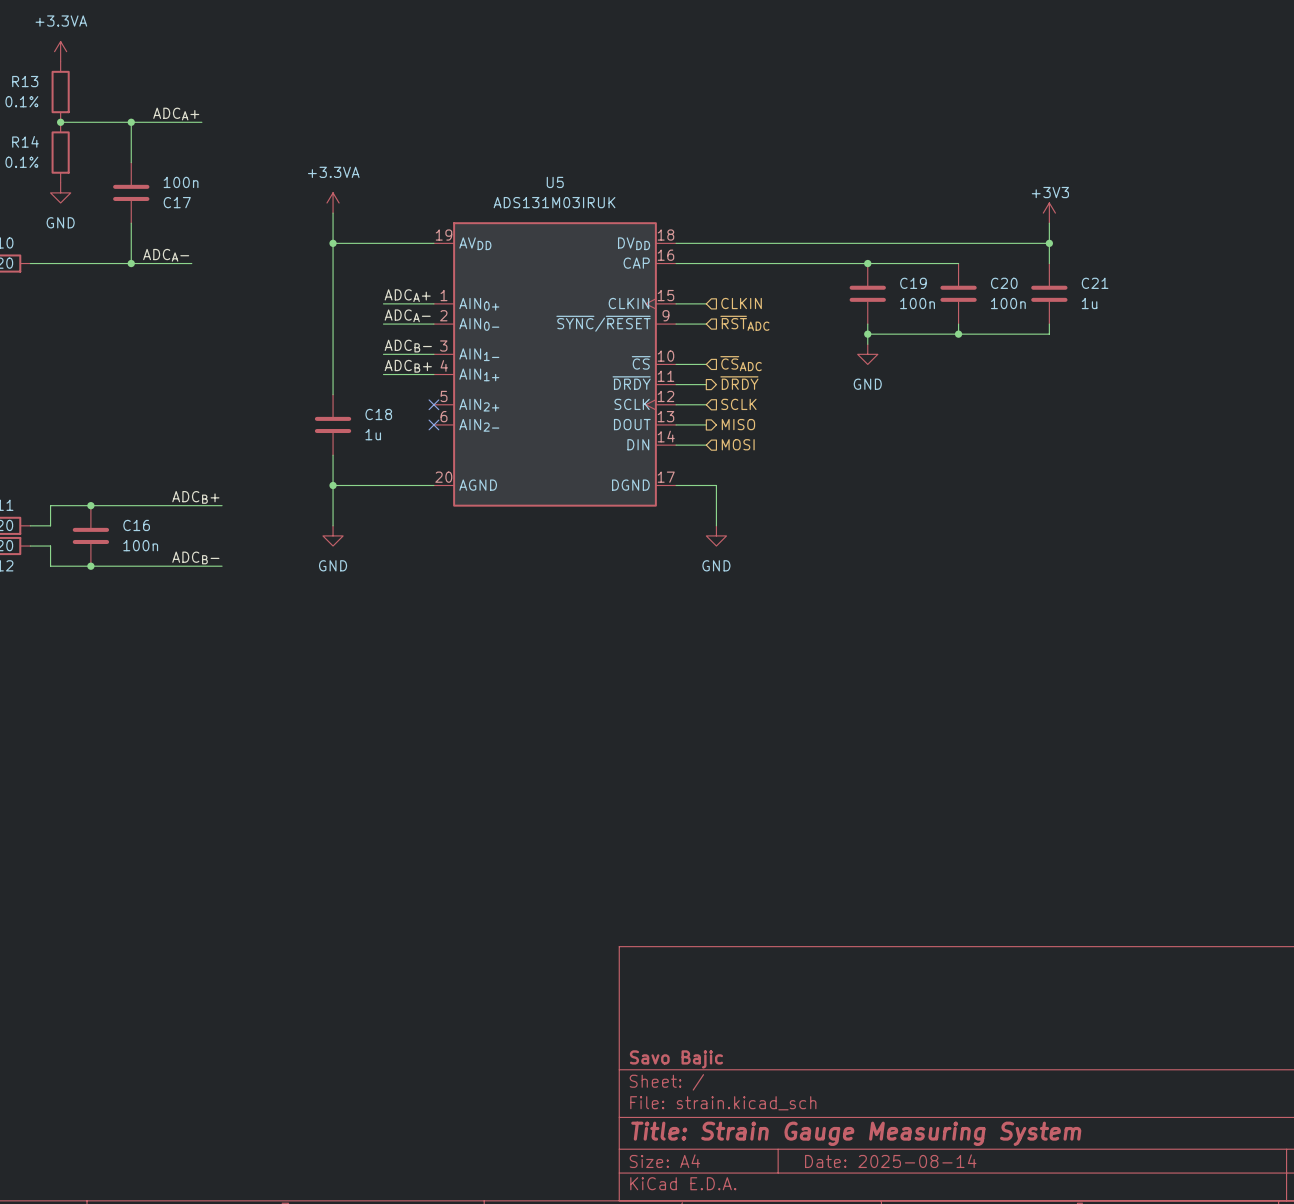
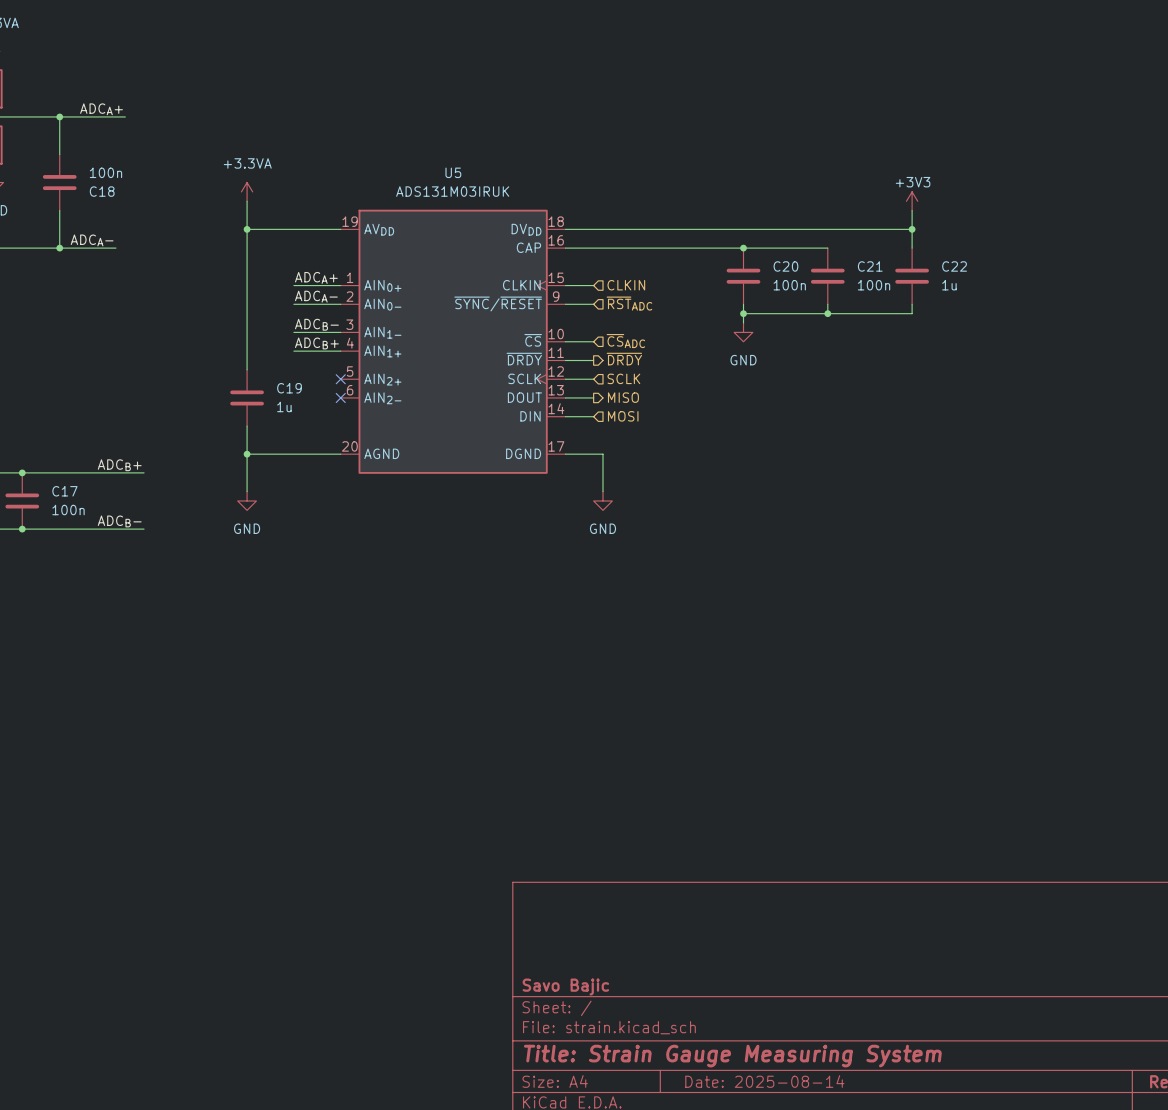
C17 name: C17 (177, 202) -> C18 (102, 191)
C19 name: C19 (913, 283) -> C20 (785, 266)
C20 name: C20 (1004, 283) -> C21 (870, 266)
C21 name: C21 (1095, 283) -> C22 (954, 266)
C18 name: C18 (378, 414) -> C19 (289, 388)
C16 name: C16 (136, 525) -> C17 (64, 491)

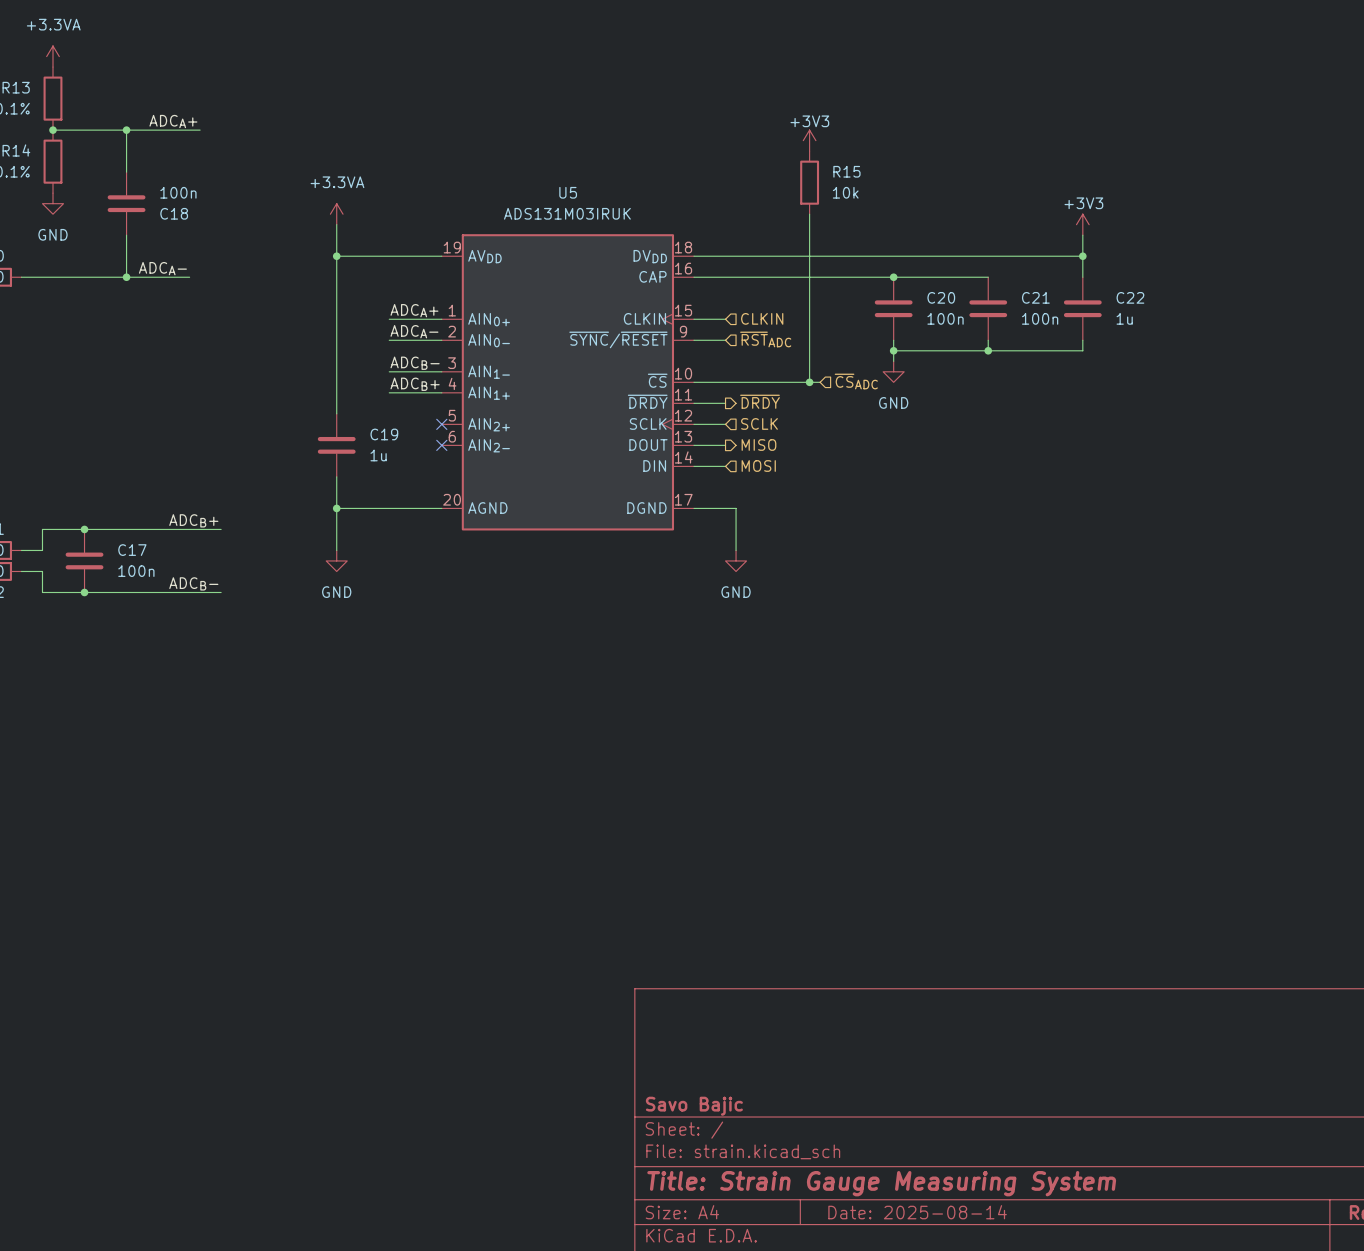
power symbol: none -> +3V3 (809, 140)
R15: none -> 10k (809, 182)
wire: none -> (809, 214) (809, 382)
wire: none -> (725, 382) (820, 382)
hierarchical label position: ~{CS}ADC (625, 341) -> ~{CS}ADC (856, 381)
junction: none -> (809, 382)

